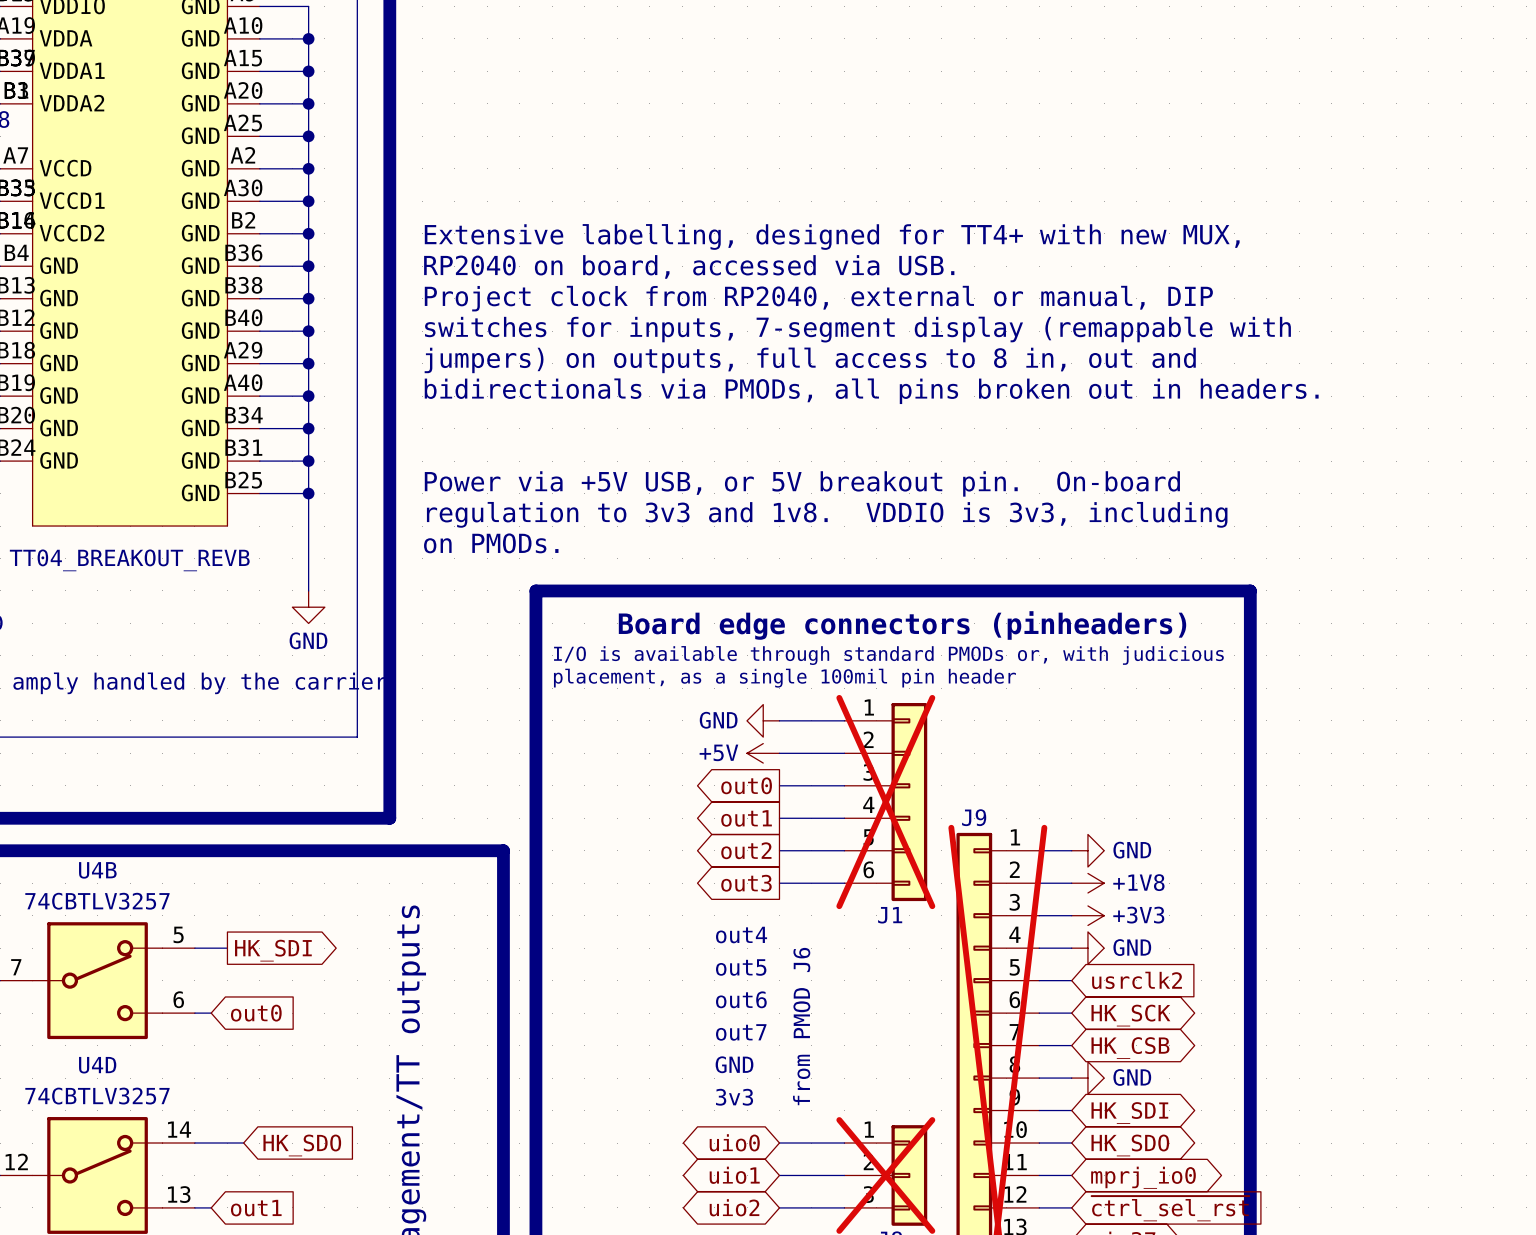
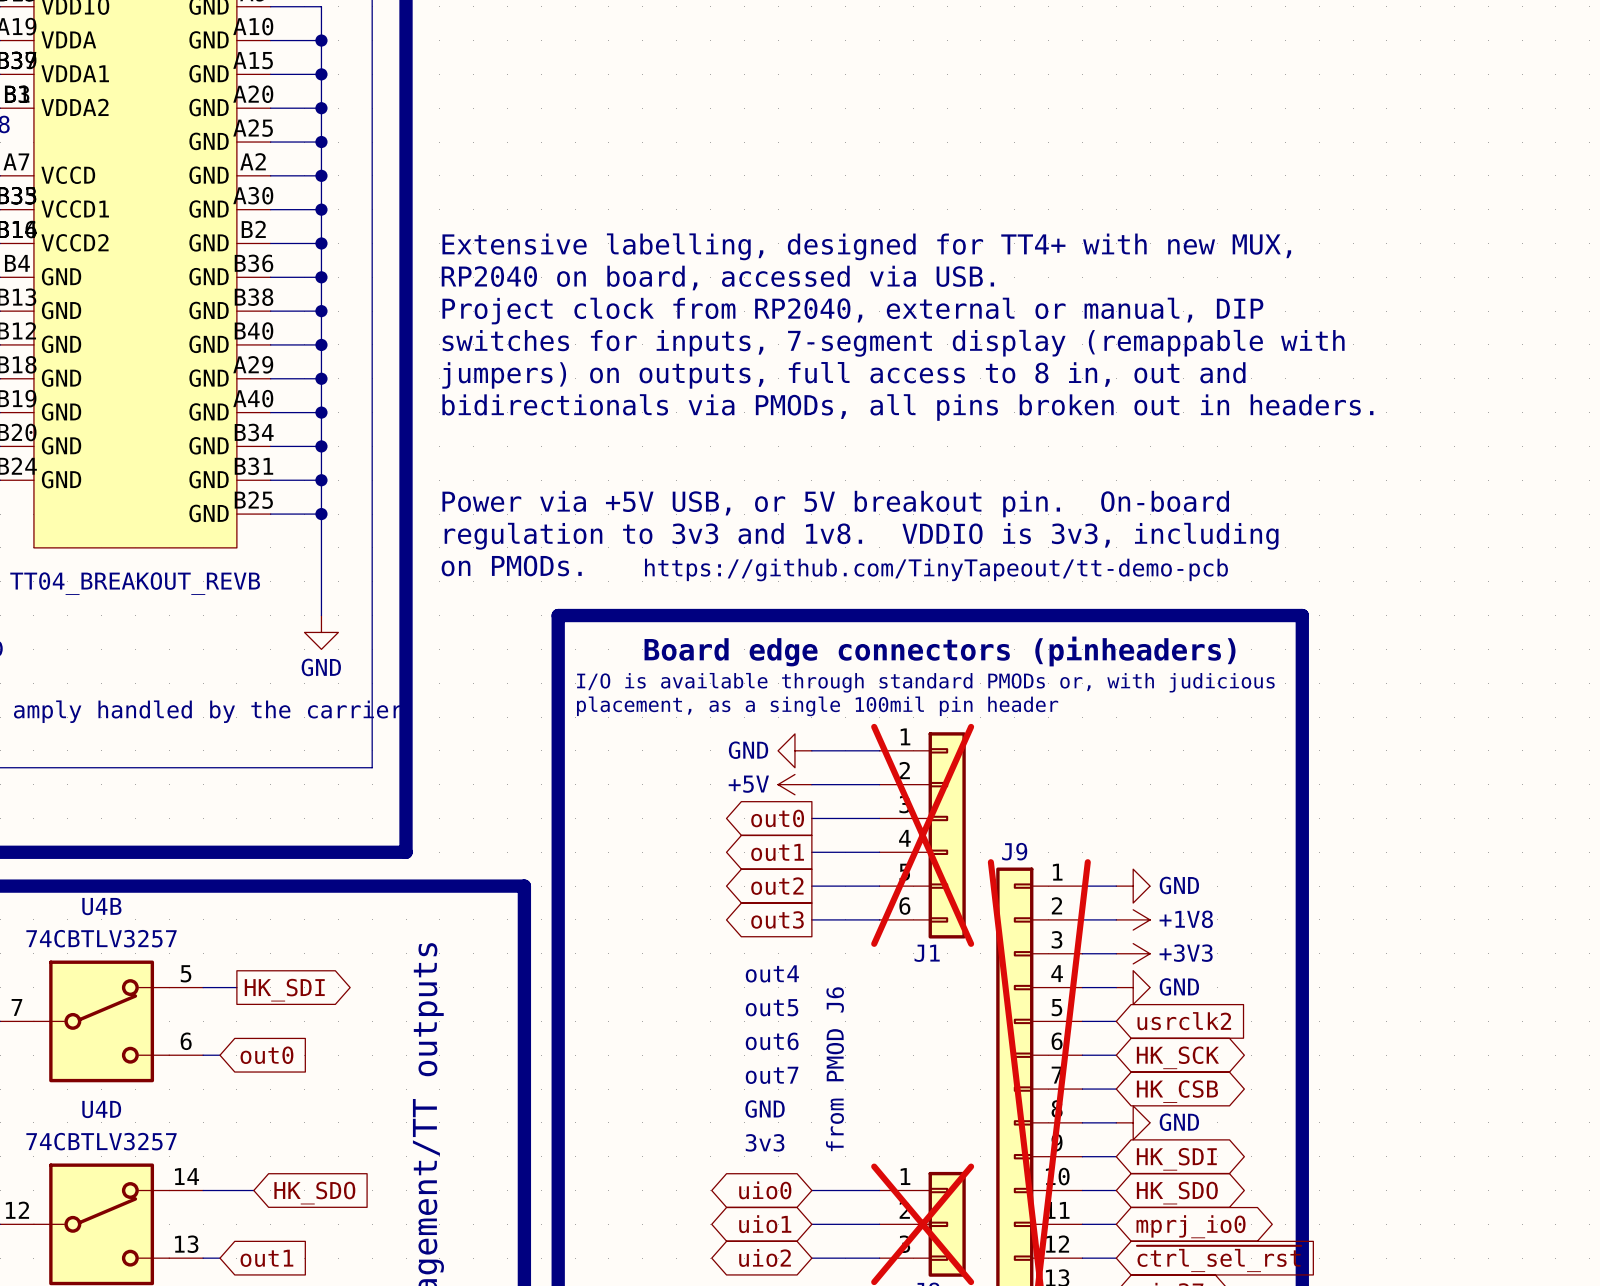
text: none -> https://github.com/TinyTapeout/tt-demo-pcb (936, 569)

